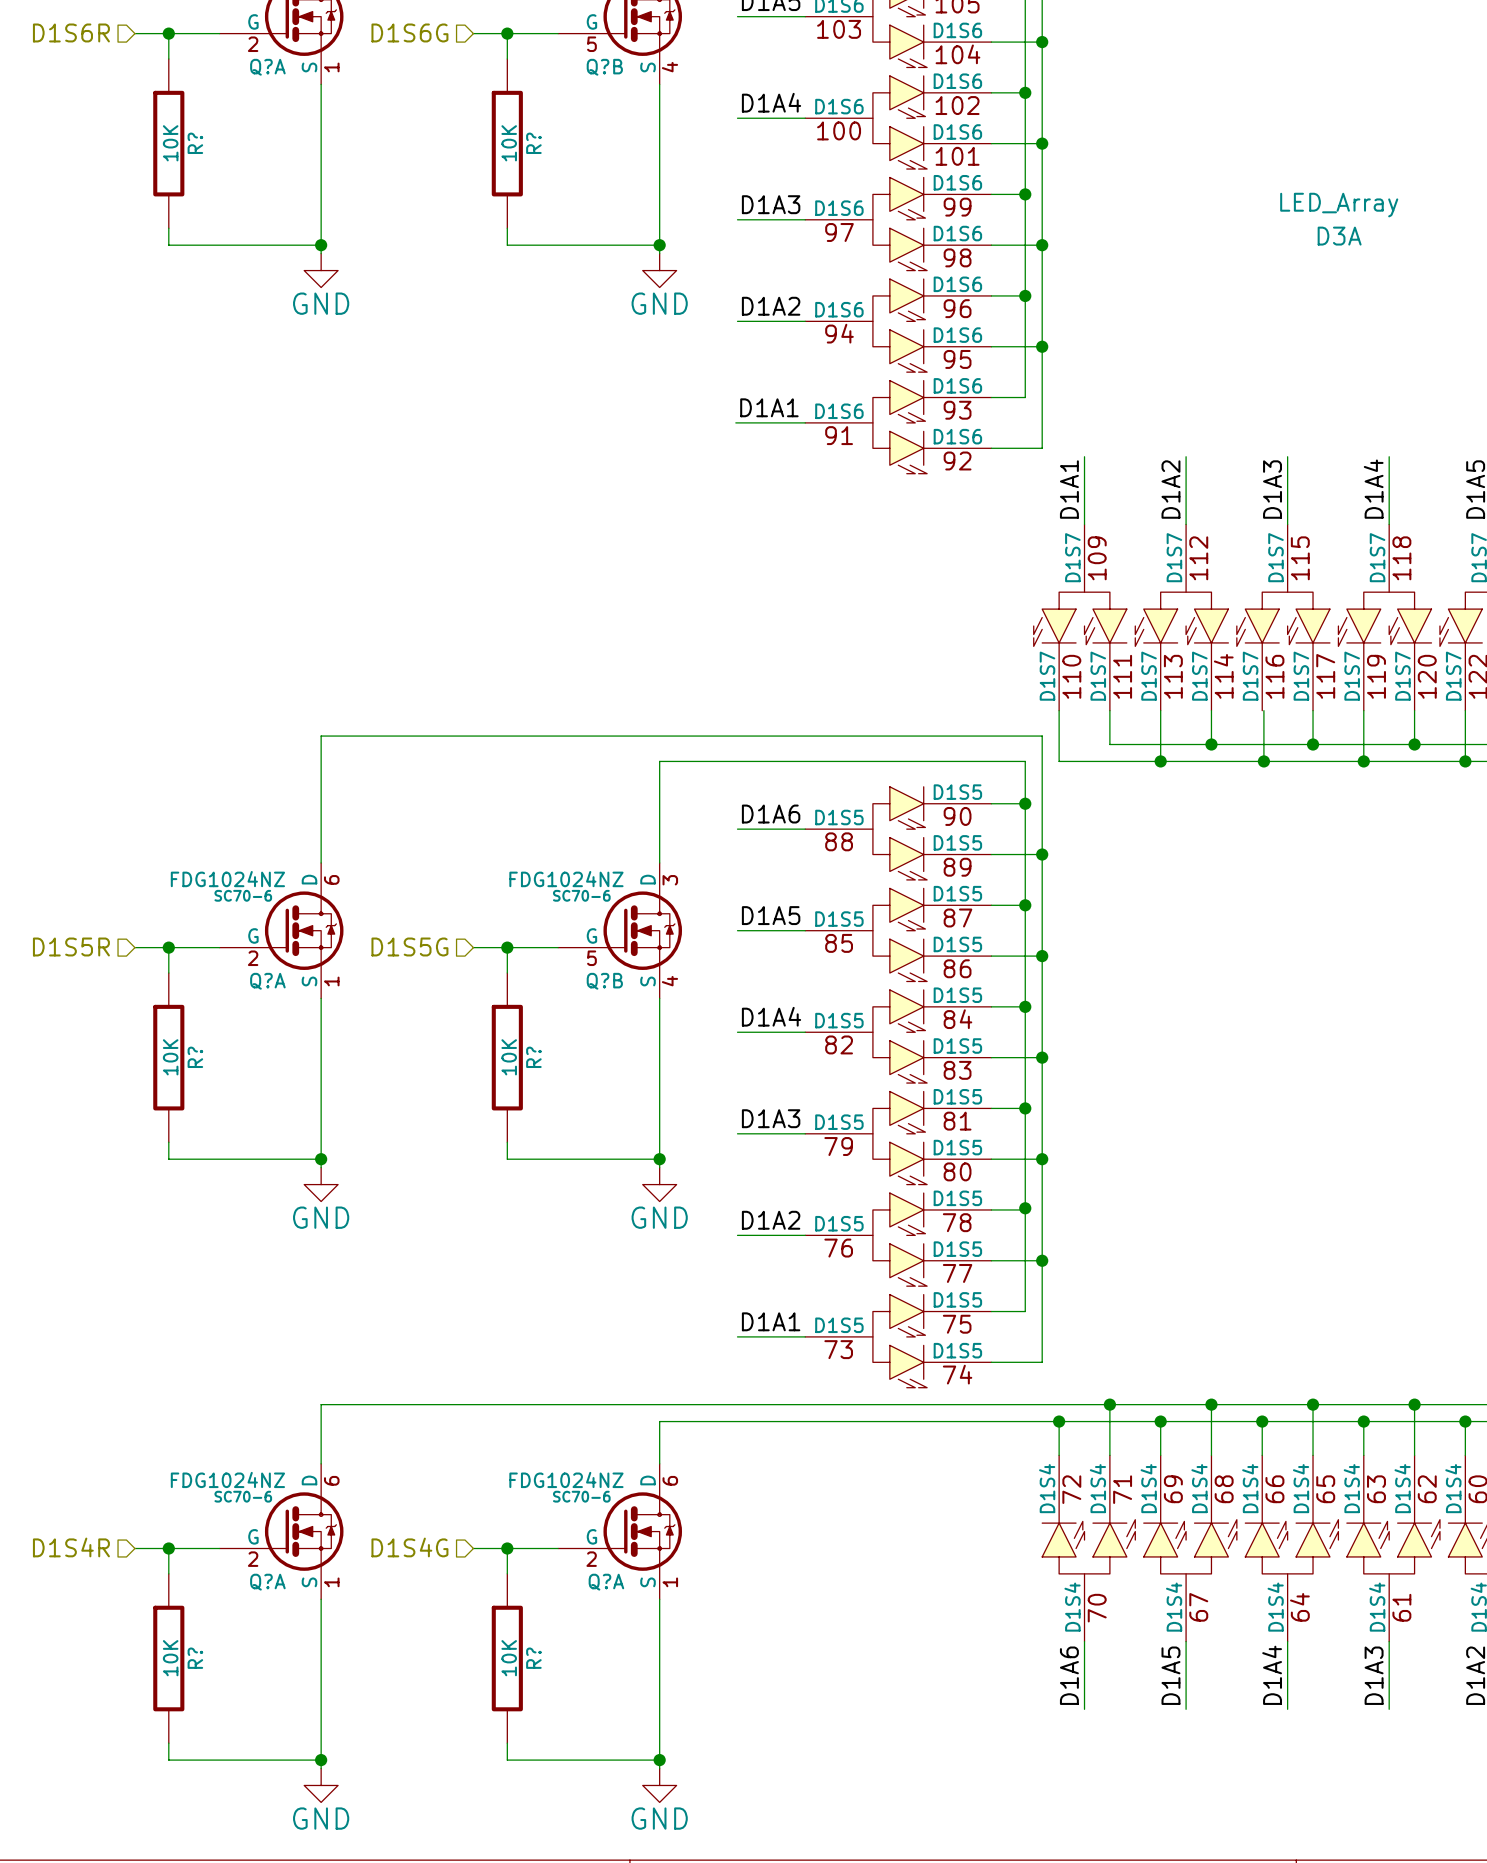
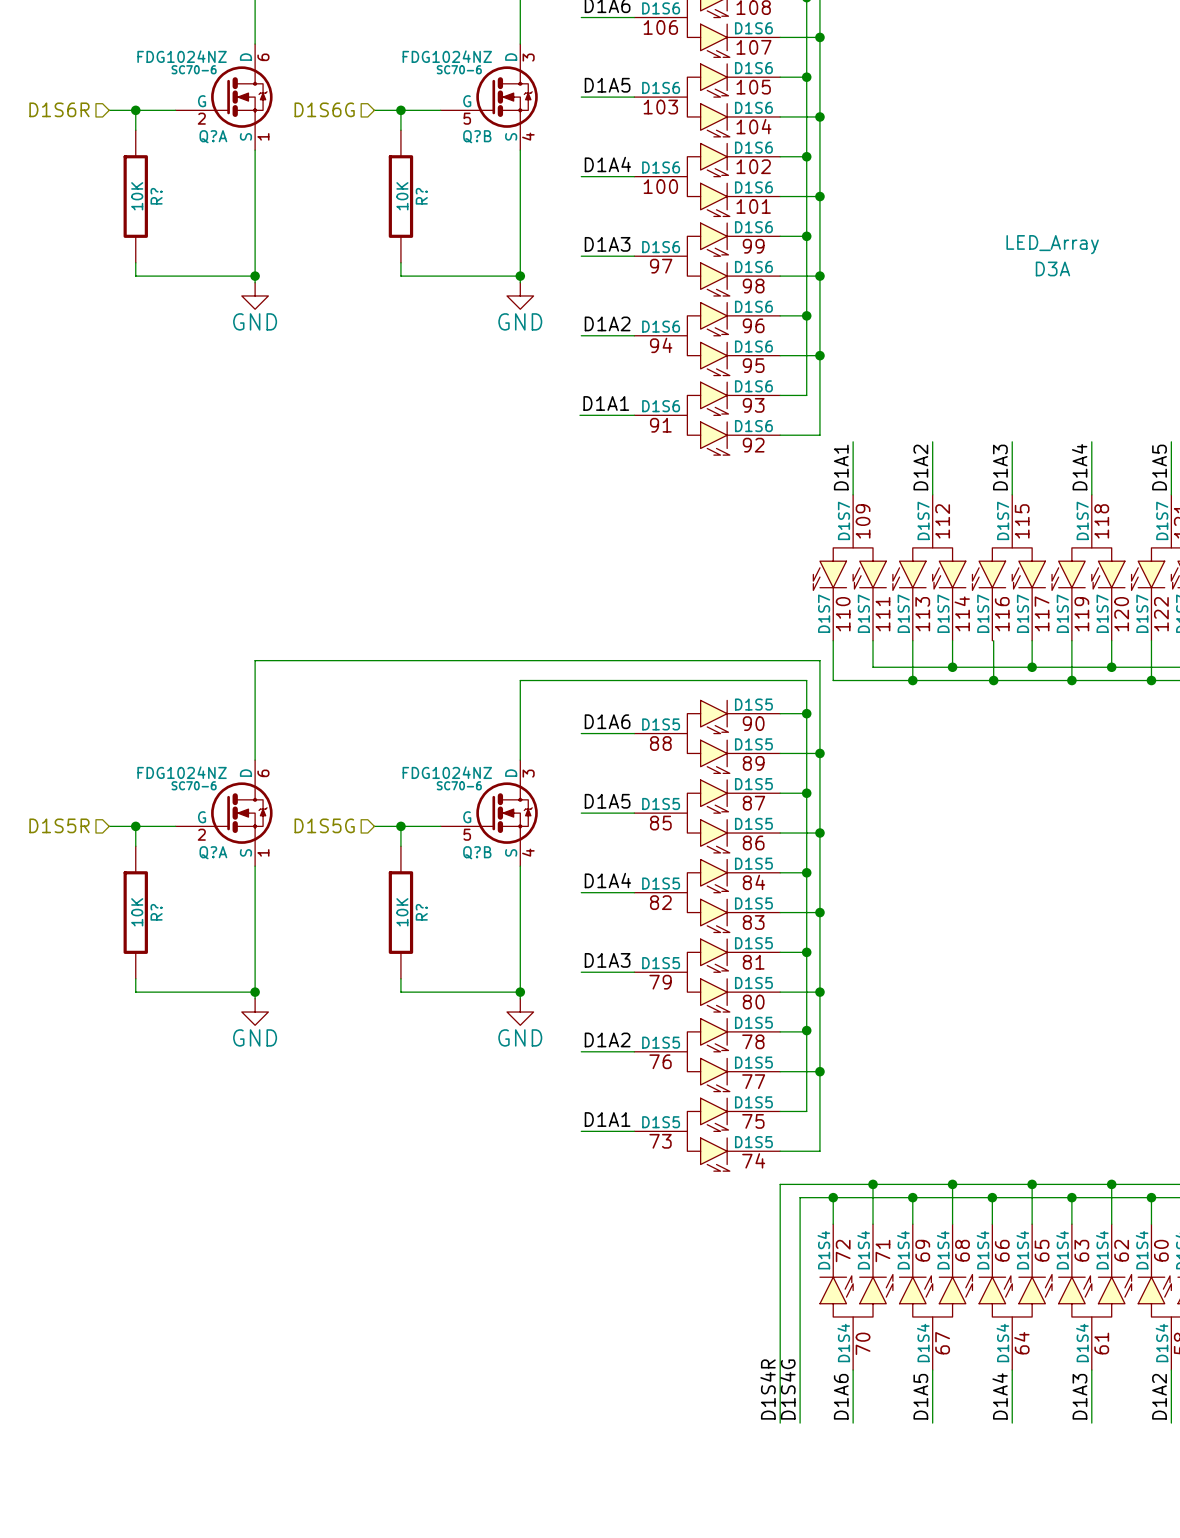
wire: (991, 1404) (321, 1404) (321, 1463) -> (780, 1184) (780, 1423)
wire: (1016, 1421) (659, 1421) (659, 1463) -> (800, 1197) (800, 1423)
Q?A: FDG1024NZ (281, 1531) -> none
Q?A: FDG1024NZ (620, 1531) -> none
hierarchical label: D1S4R (71, 1547) -> none
hierarchical label: D1S4G (409, 1547) -> none
wire: (134, 1548) (219, 1548) -> none
wire: (168, 1548) (168, 1573) -> none
junction: (168, 1548) -> none
wire: (473, 1548) (558, 1548) -> none
wire: (507, 1548) (507, 1573) -> none
junction: (507, 1548) -> none
wire: (321, 1599) (321, 1768) -> none
wire: (659, 1599) (659, 1768) -> none
R?: 10K (168, 1658) -> none
R?: 10K (507, 1658) -> none
label: none -> D1S4R (768, 1389)
label: none -> D1S4G (787, 1389)
wire: (168, 1743) (168, 1760) (321, 1760) -> none
wire: (507, 1743) (507, 1760) (659, 1760) -> none
junction: (321, 1760) -> none
junction: (659, 1760) -> none
power symbol: GND (321, 1785) -> none
power symbol: GND (659, 1785) -> none

